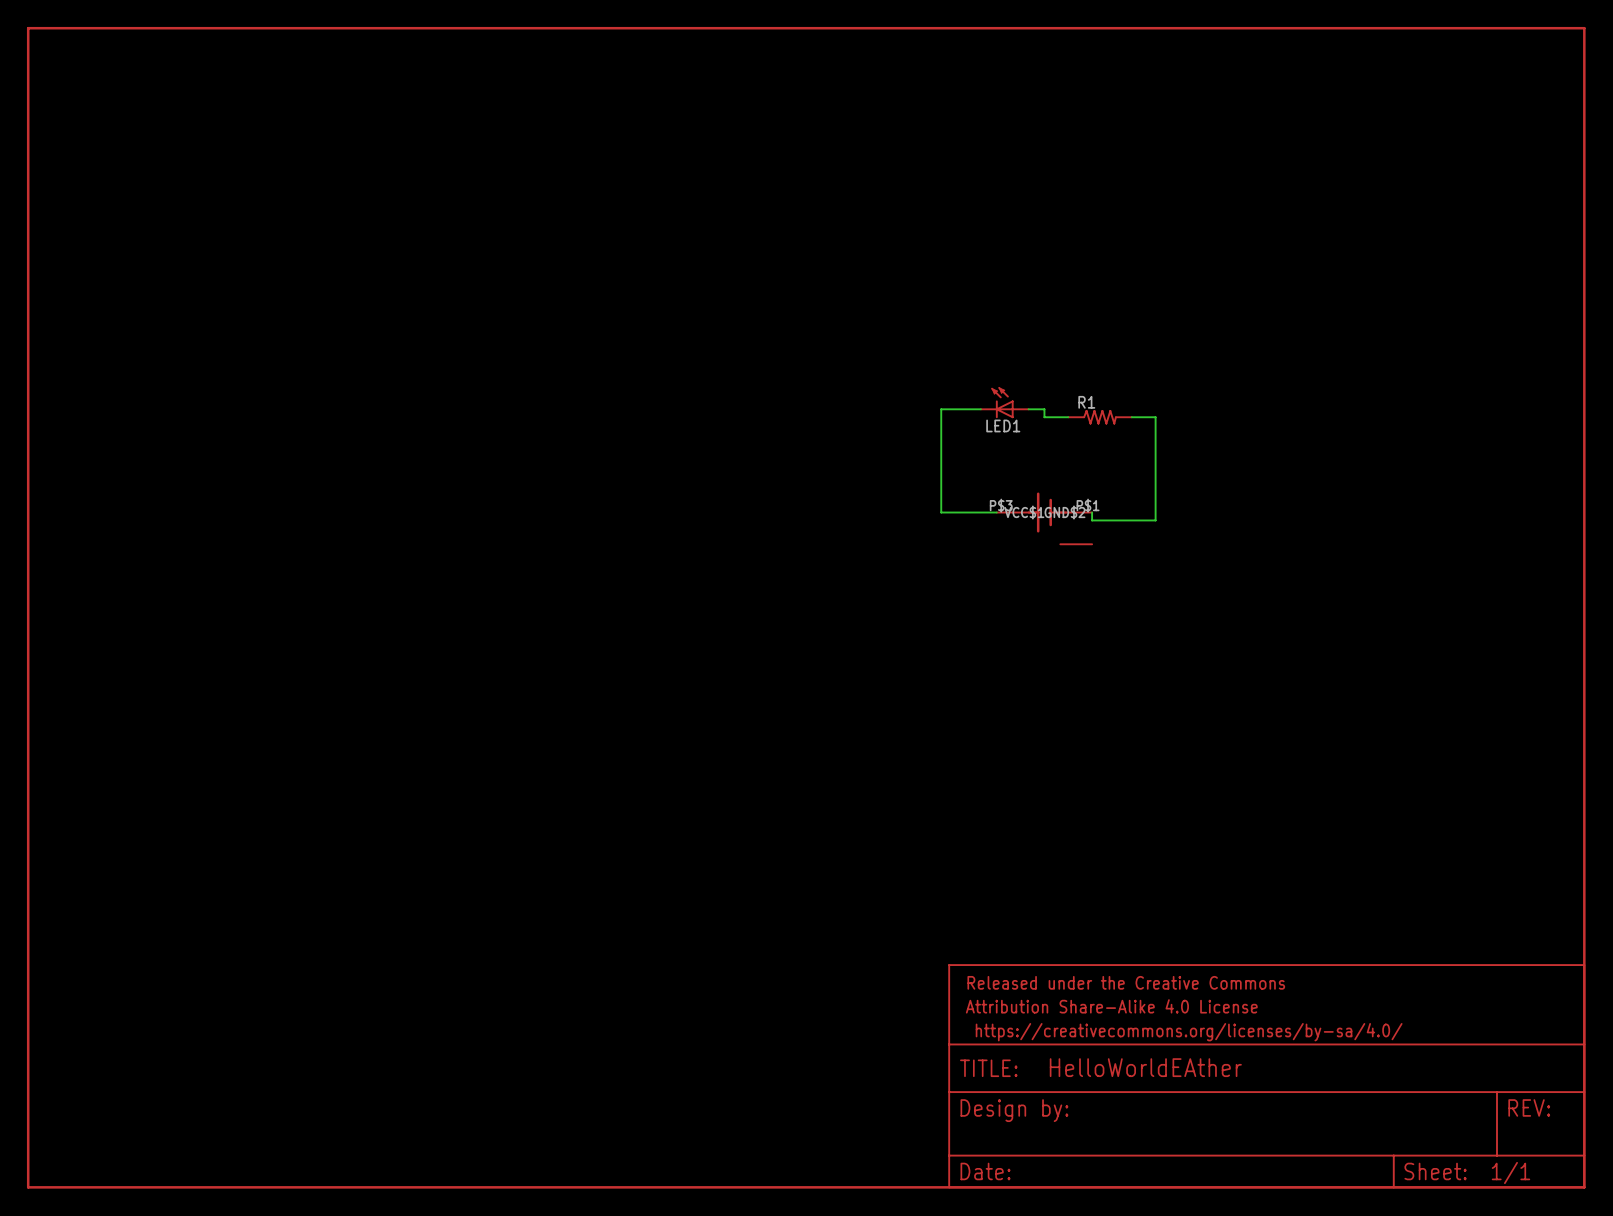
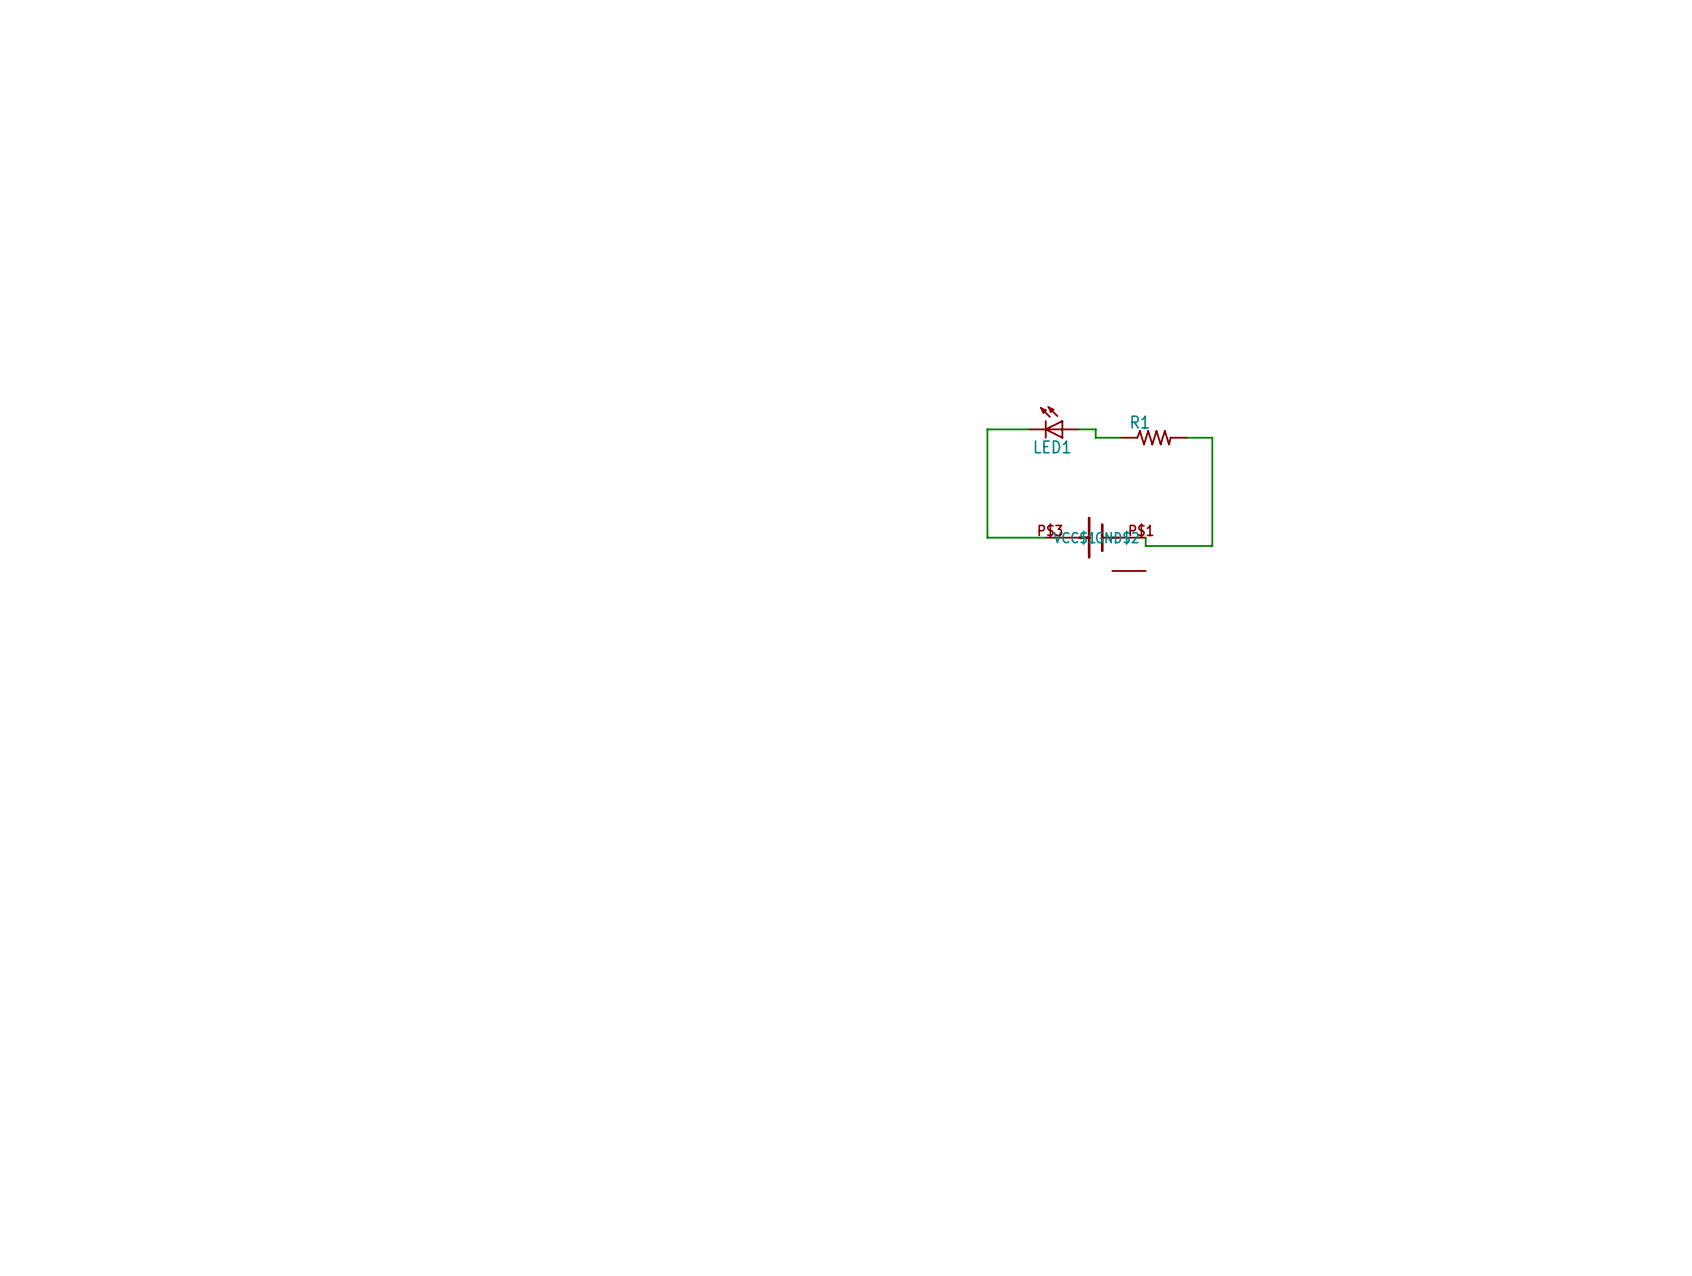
part: (806, 607) -> none
part: (1266, 1076) -> none

